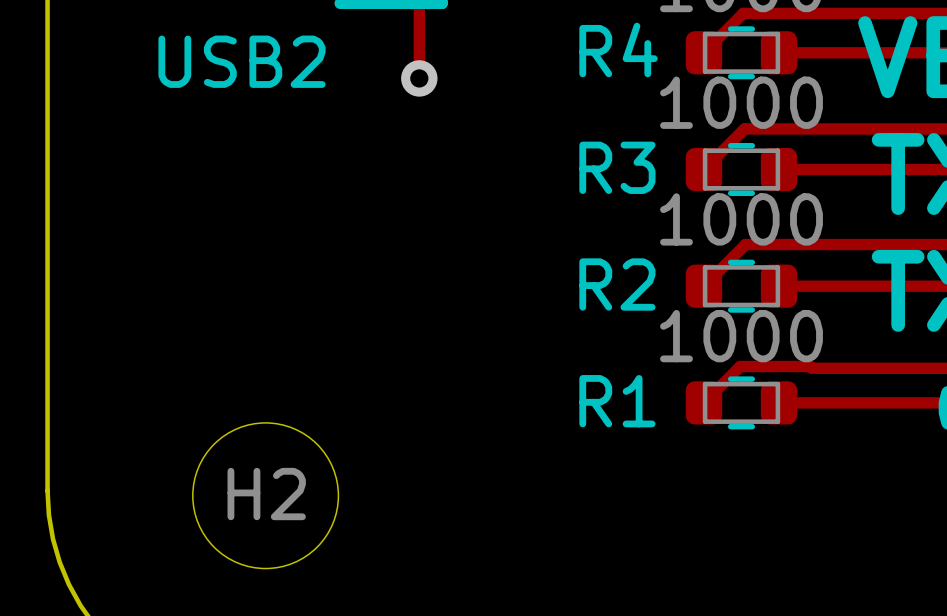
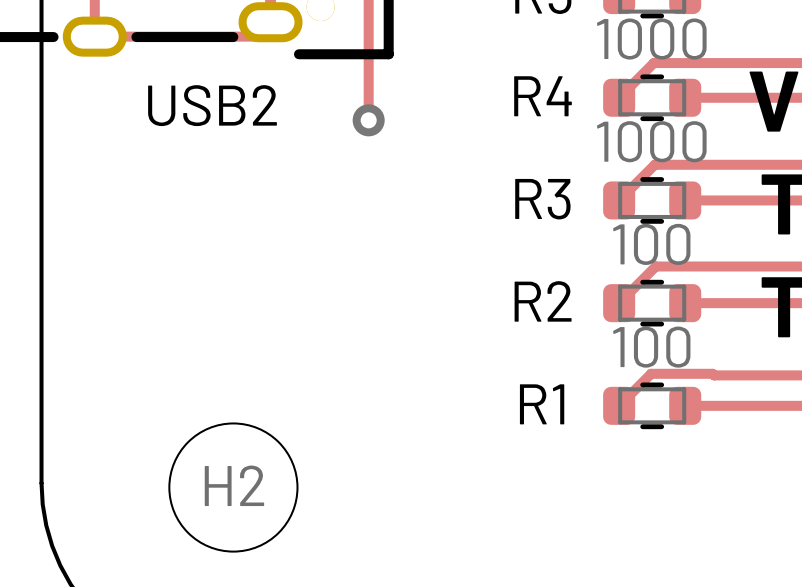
R2 value: 1000 (741, 219) -> 100 (651, 244)
R1 value: 1000 (741, 336) -> 100 (651, 347)

